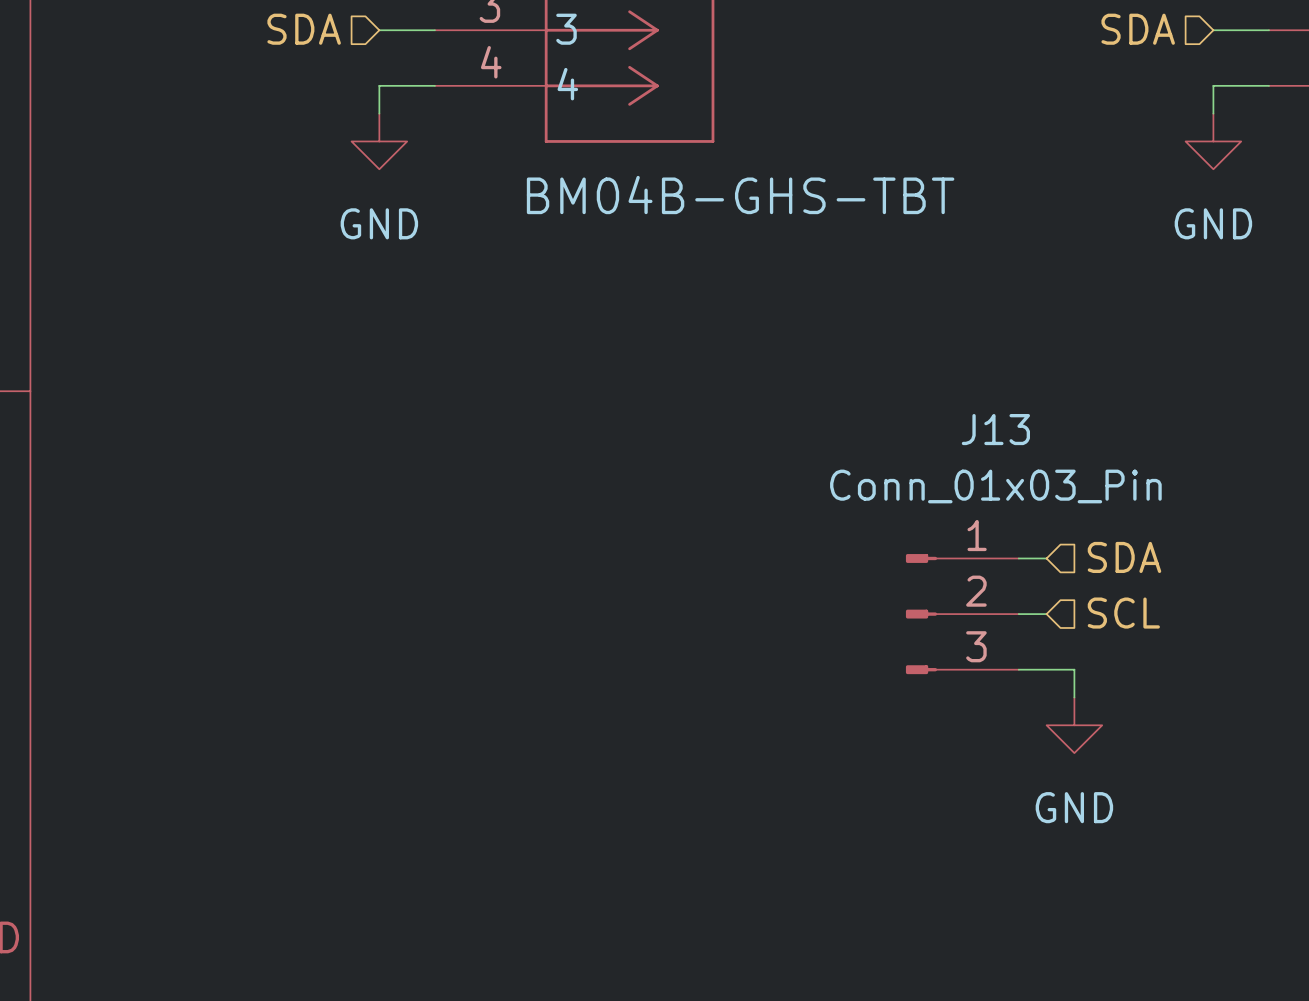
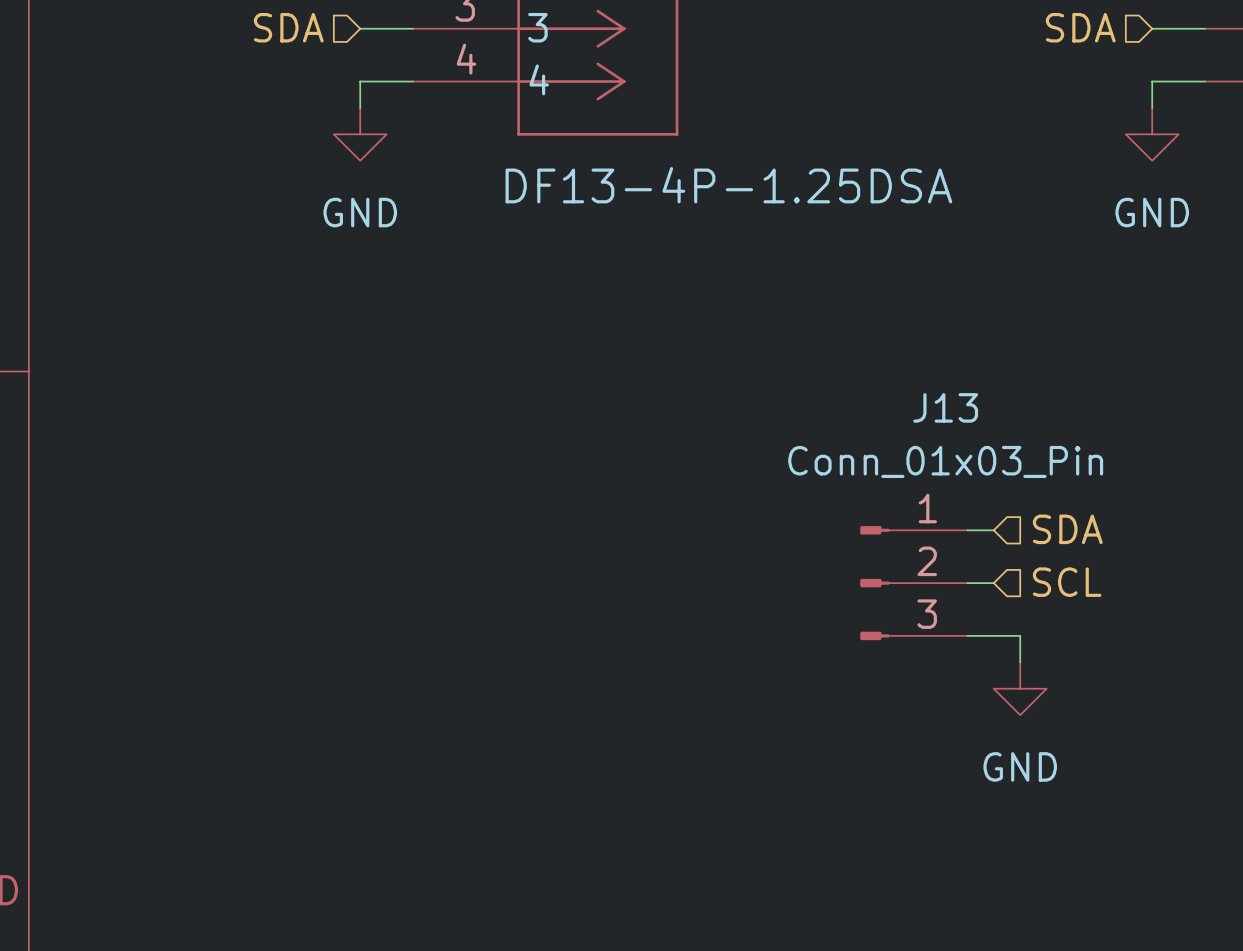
part value: BM04B-GHS-TBT (740, 195) -> DF13-4P-1.25DSA (728, 185)

